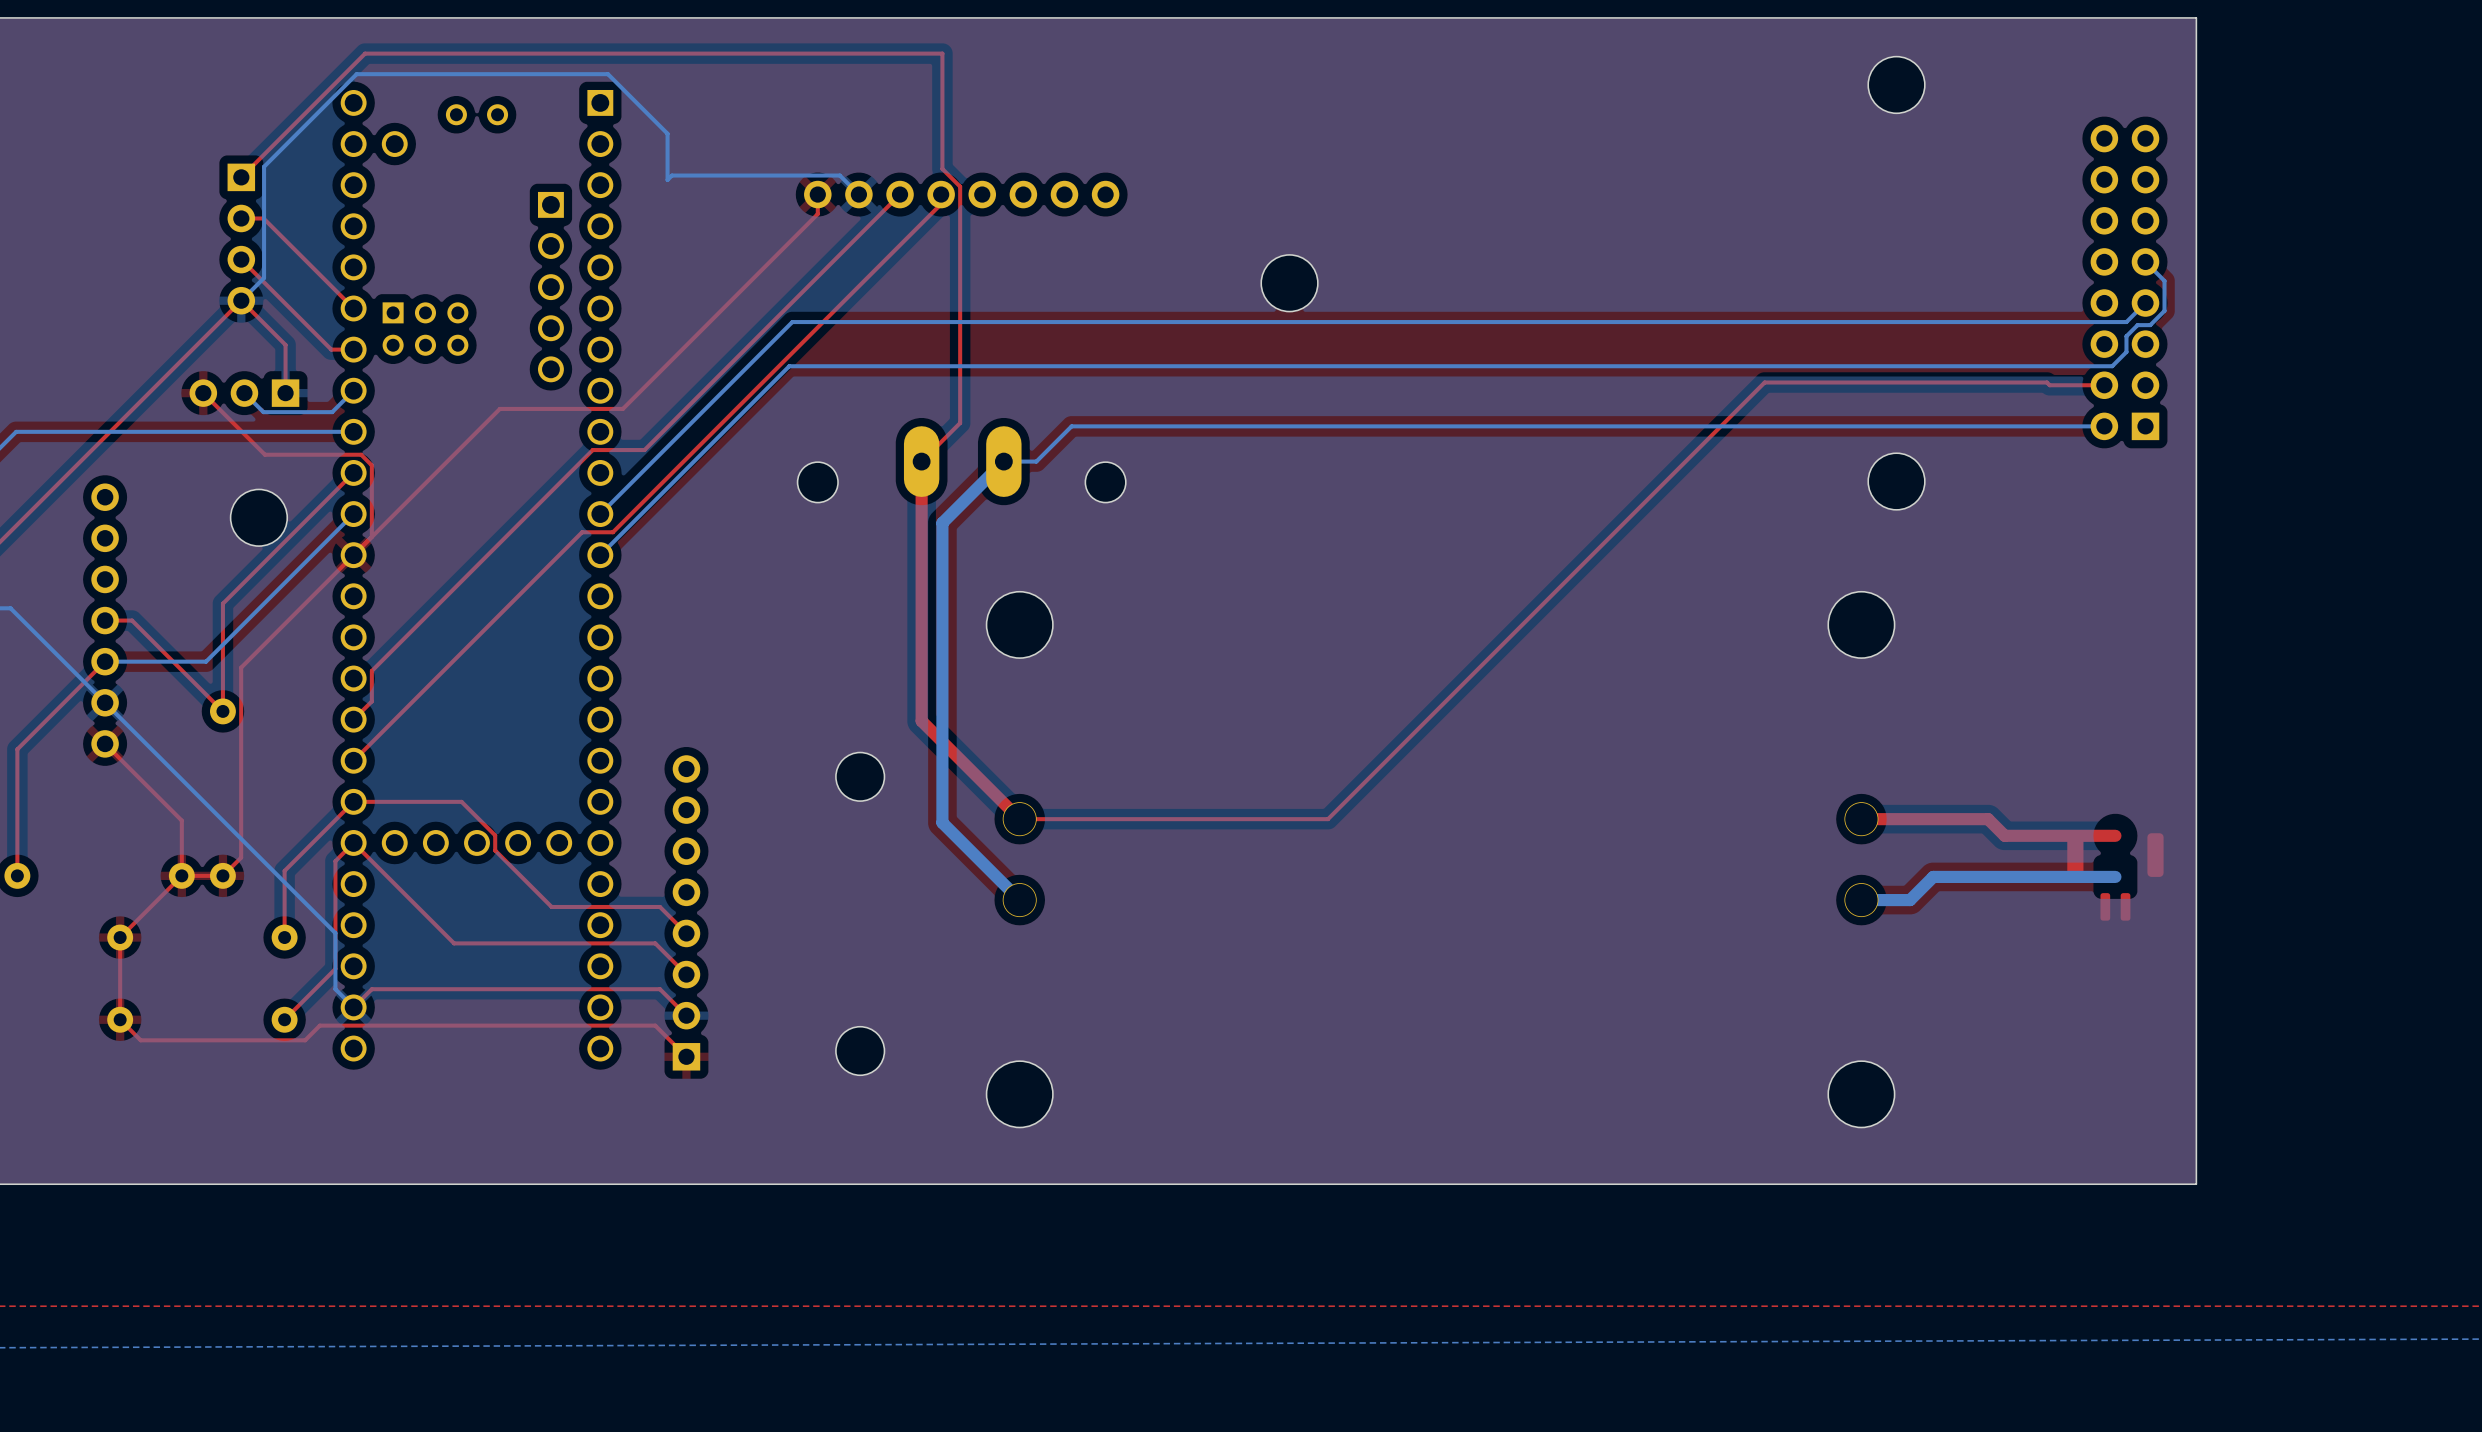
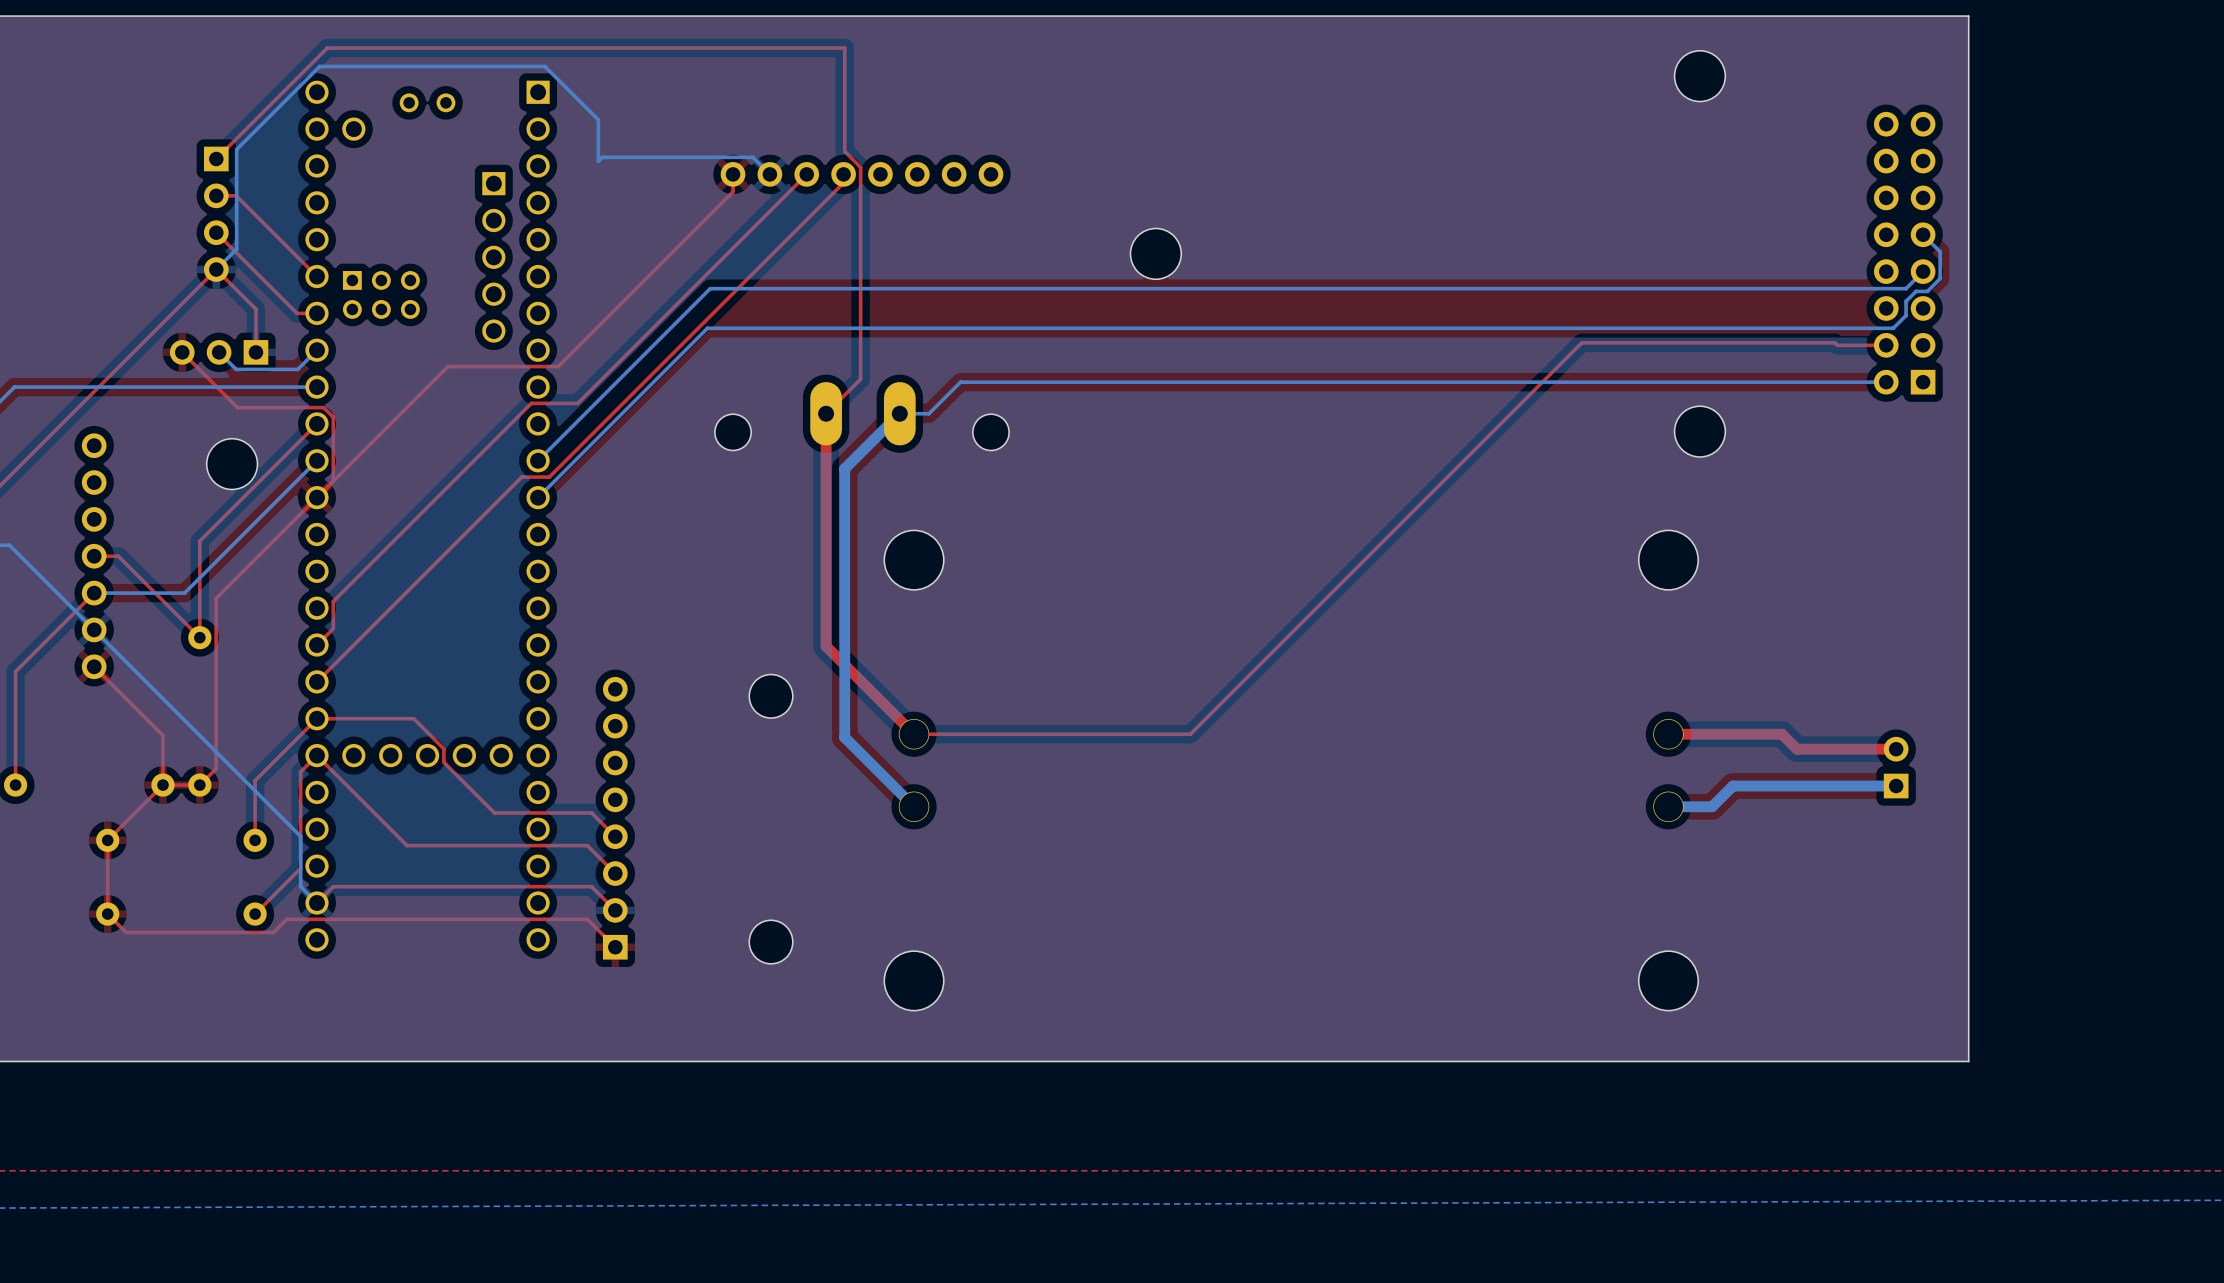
part: none -> (1896, 767)
part: (2115, 876) -> none

